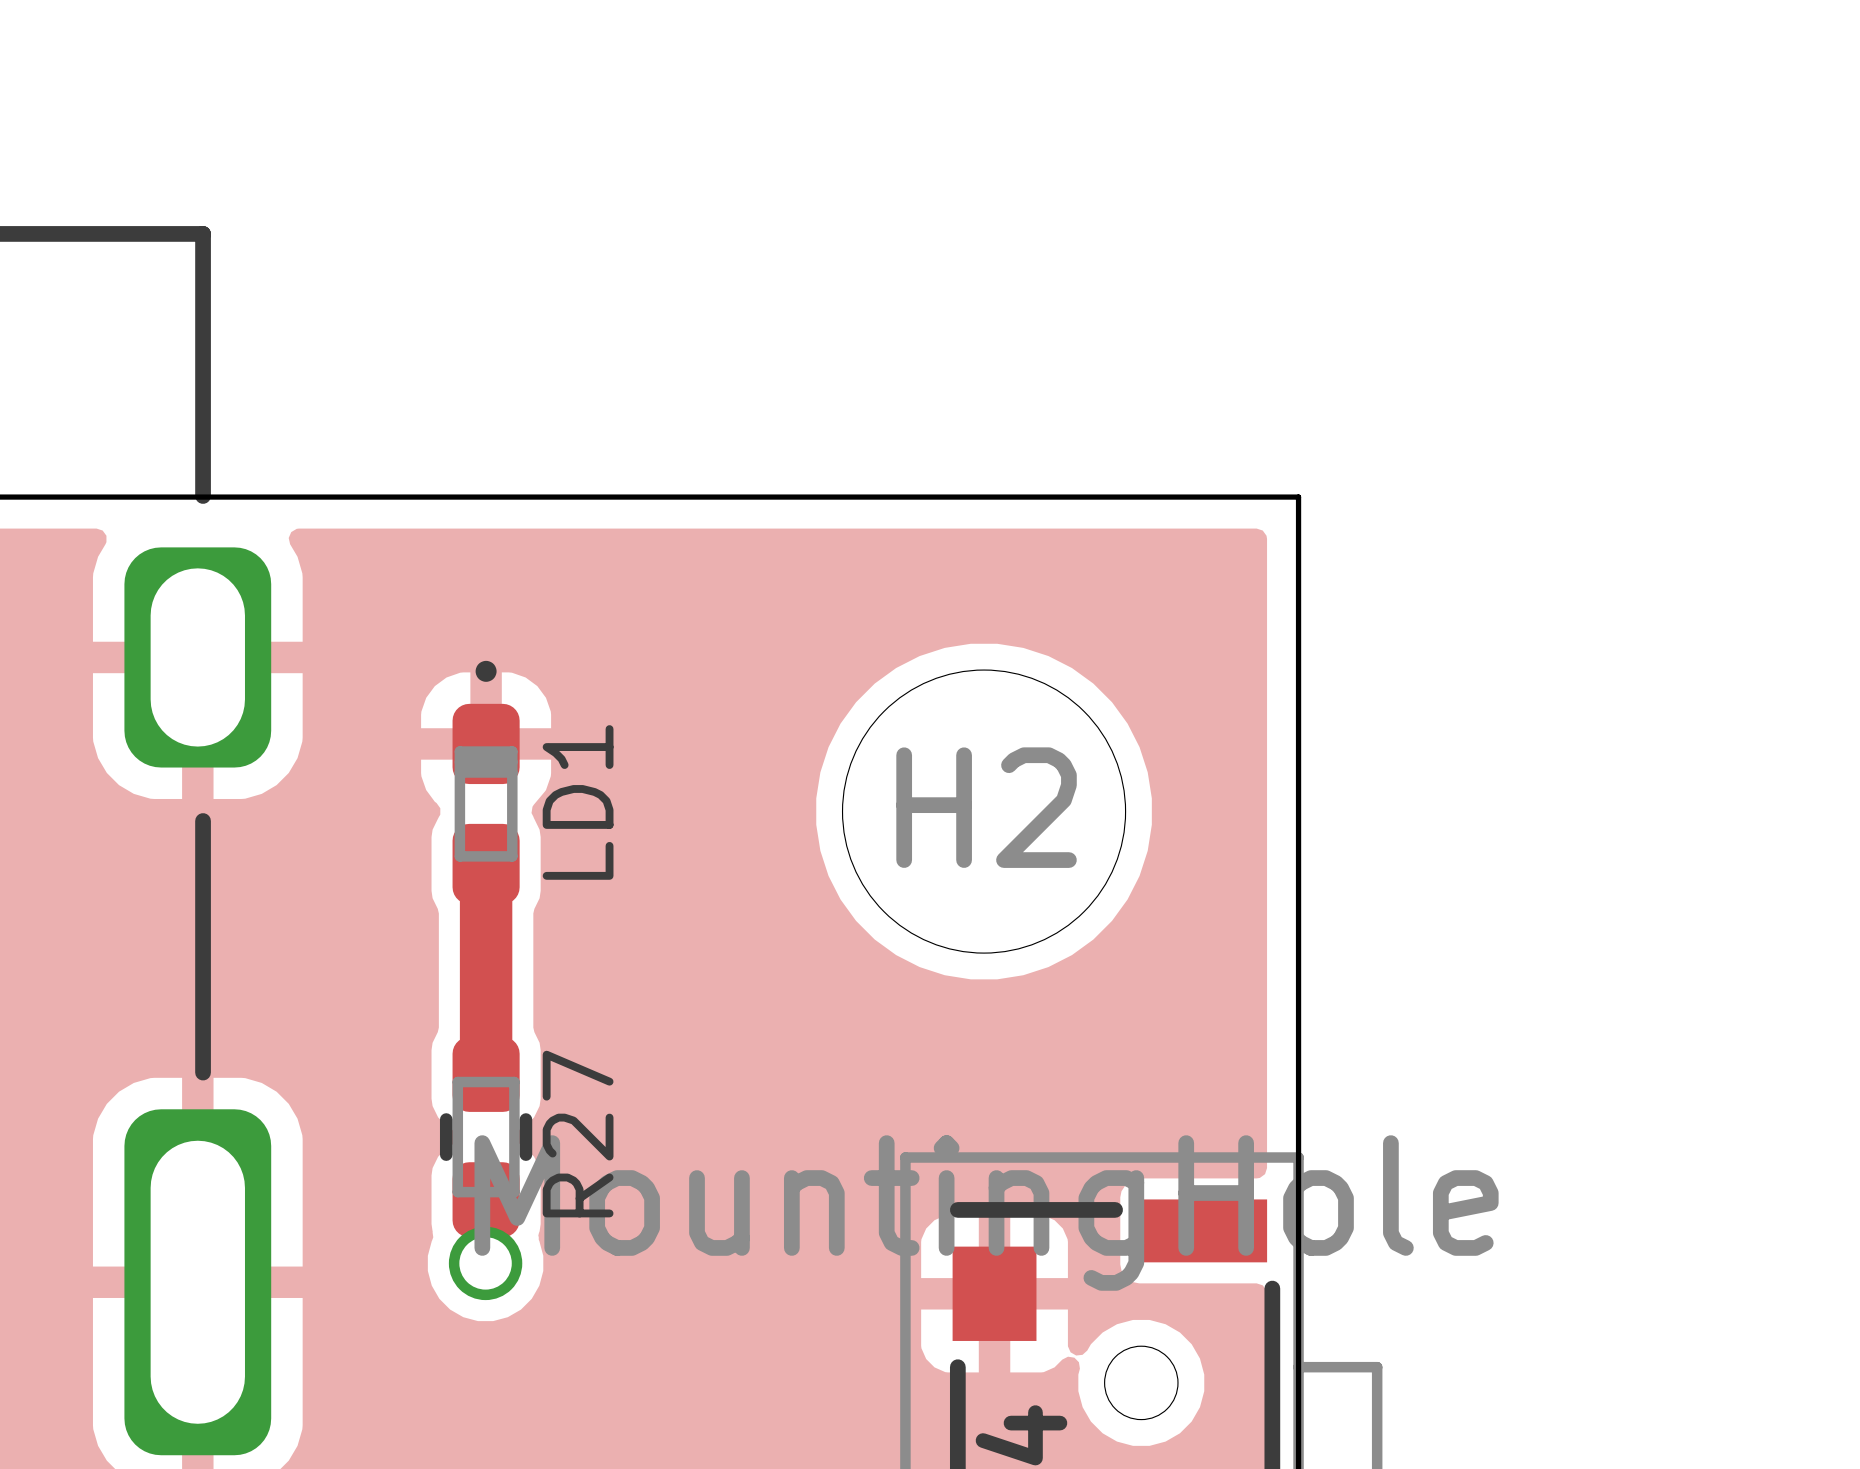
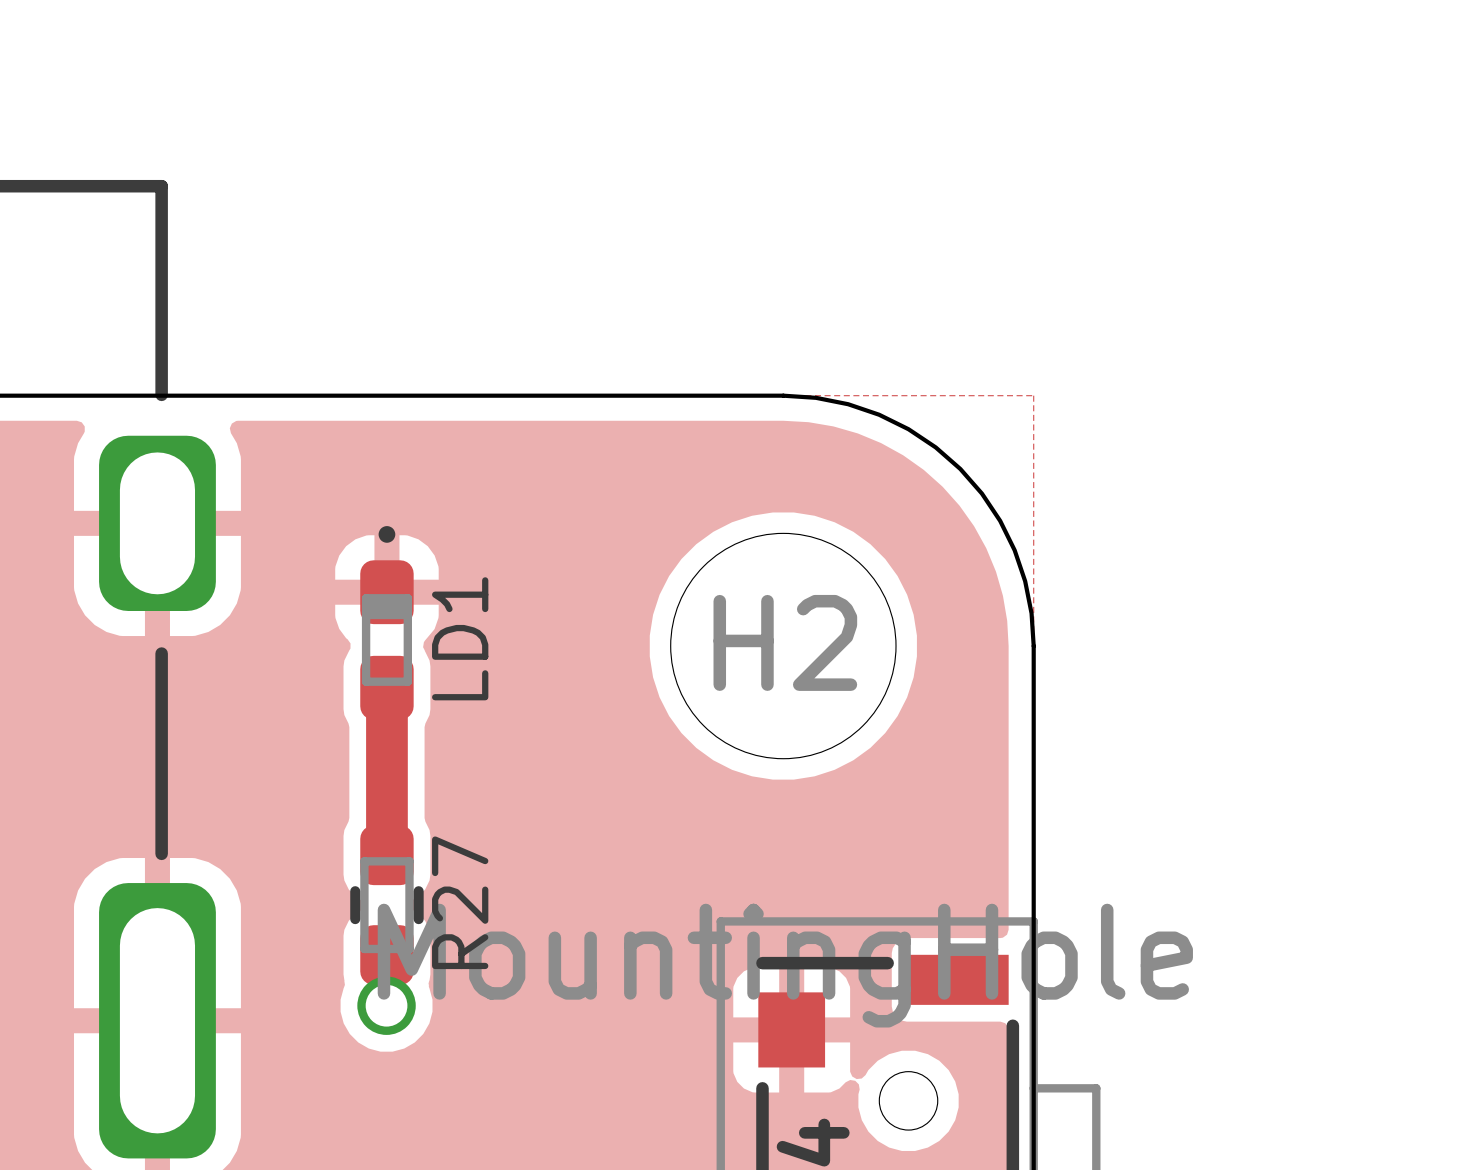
board edge: (984, 497) (1298, 497) (1298, 811) -> (783, 395) (816, 397) (848, 404) (879, 414) (908, 429) (935, 447) (960, 469) (981, 493) (1000, 520) (1014, 550) (1025, 581) (1031, 613) (1033, 646)

